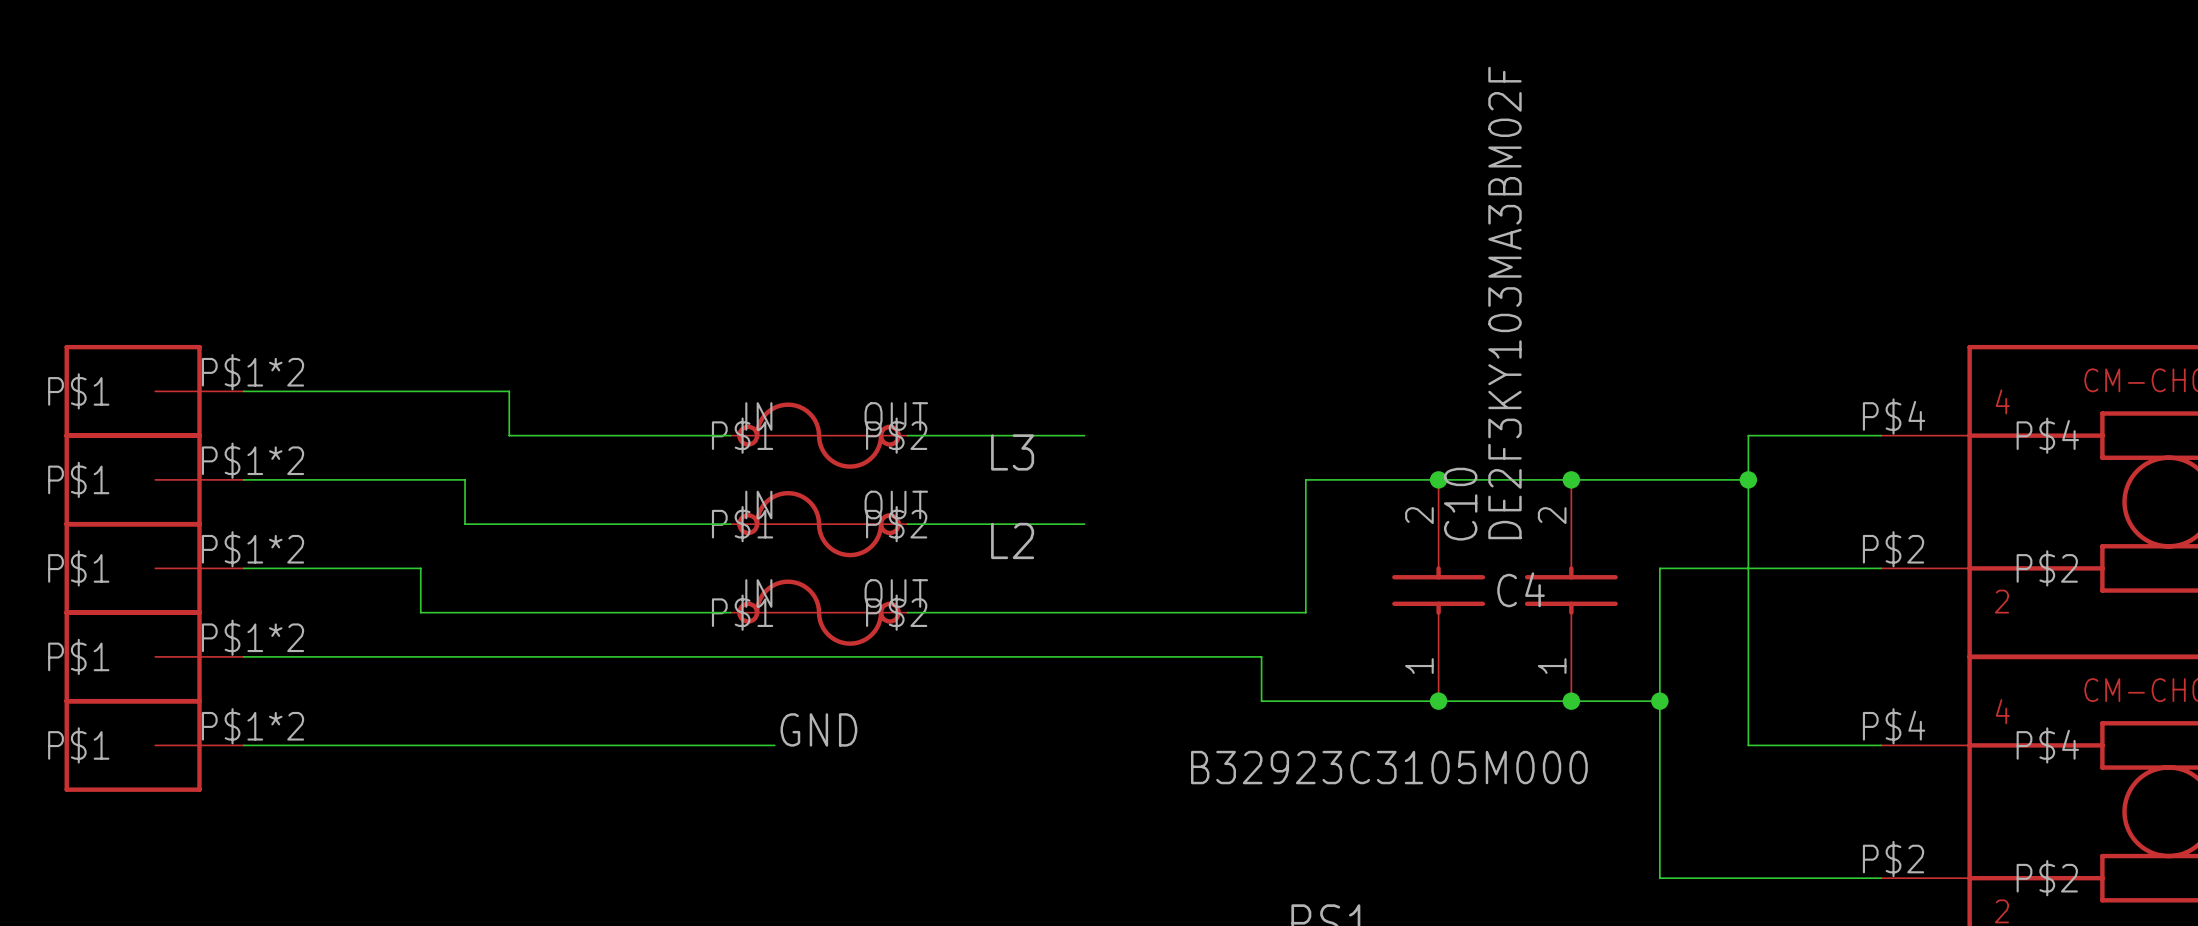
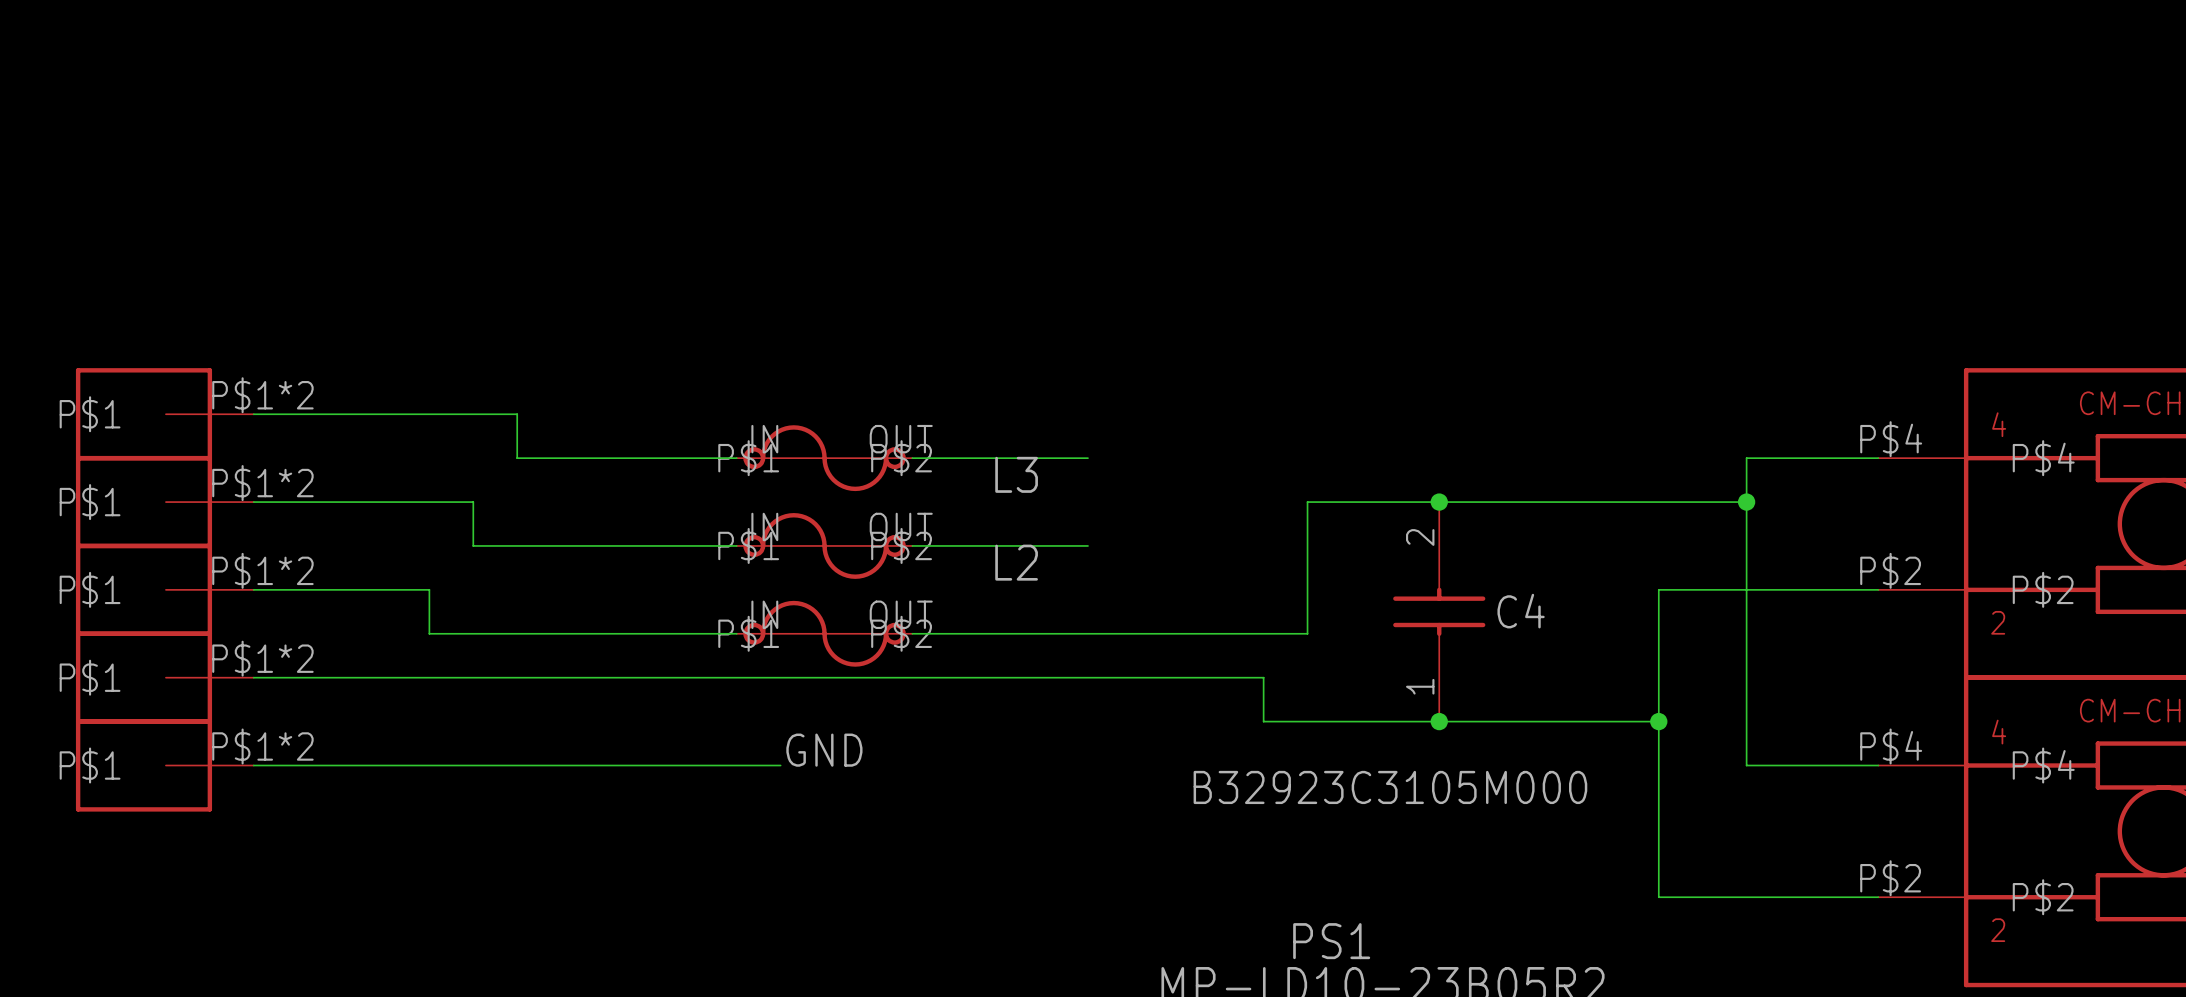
junction: (1571, 479) -> none
C10: DE2F3KY103MA3BM02F (1571, 590) -> none
junction: (1571, 701) -> none

